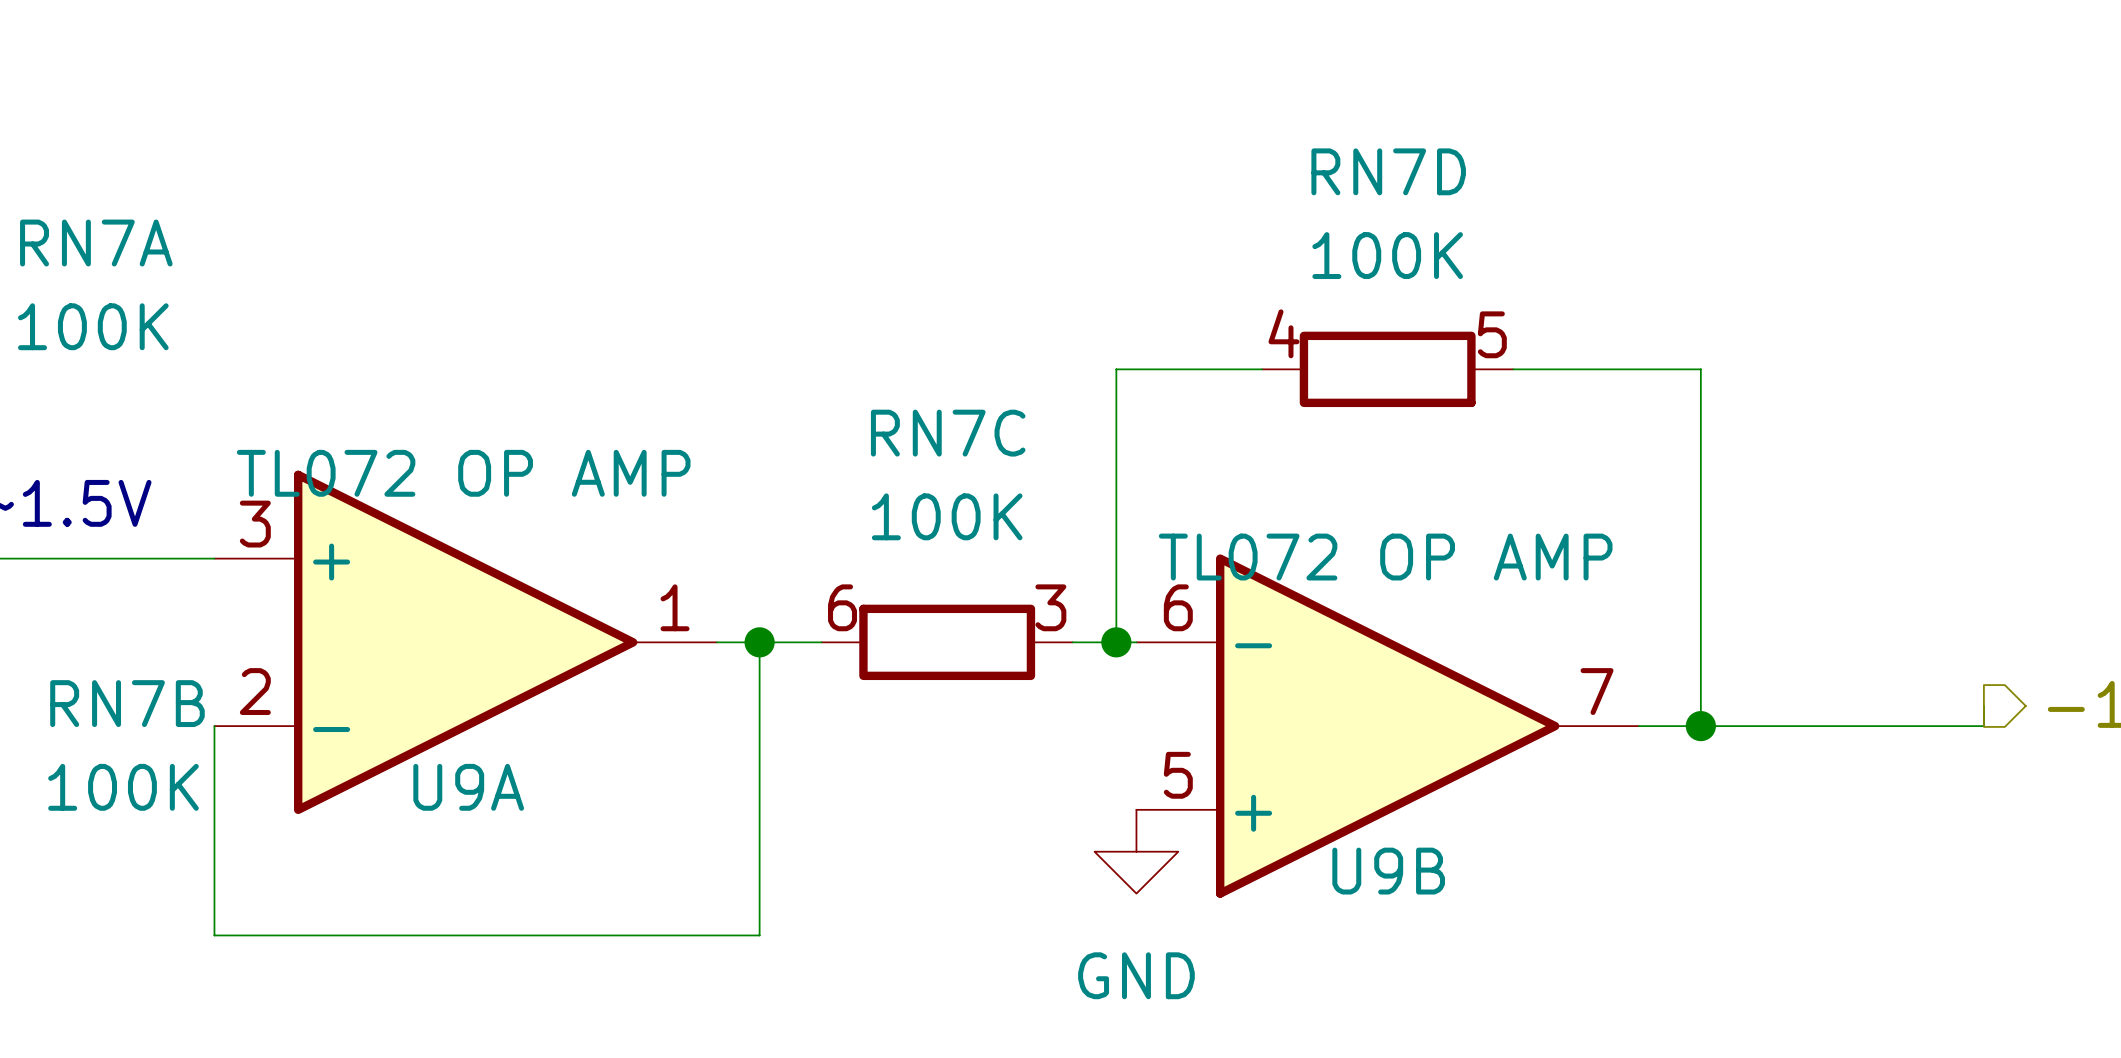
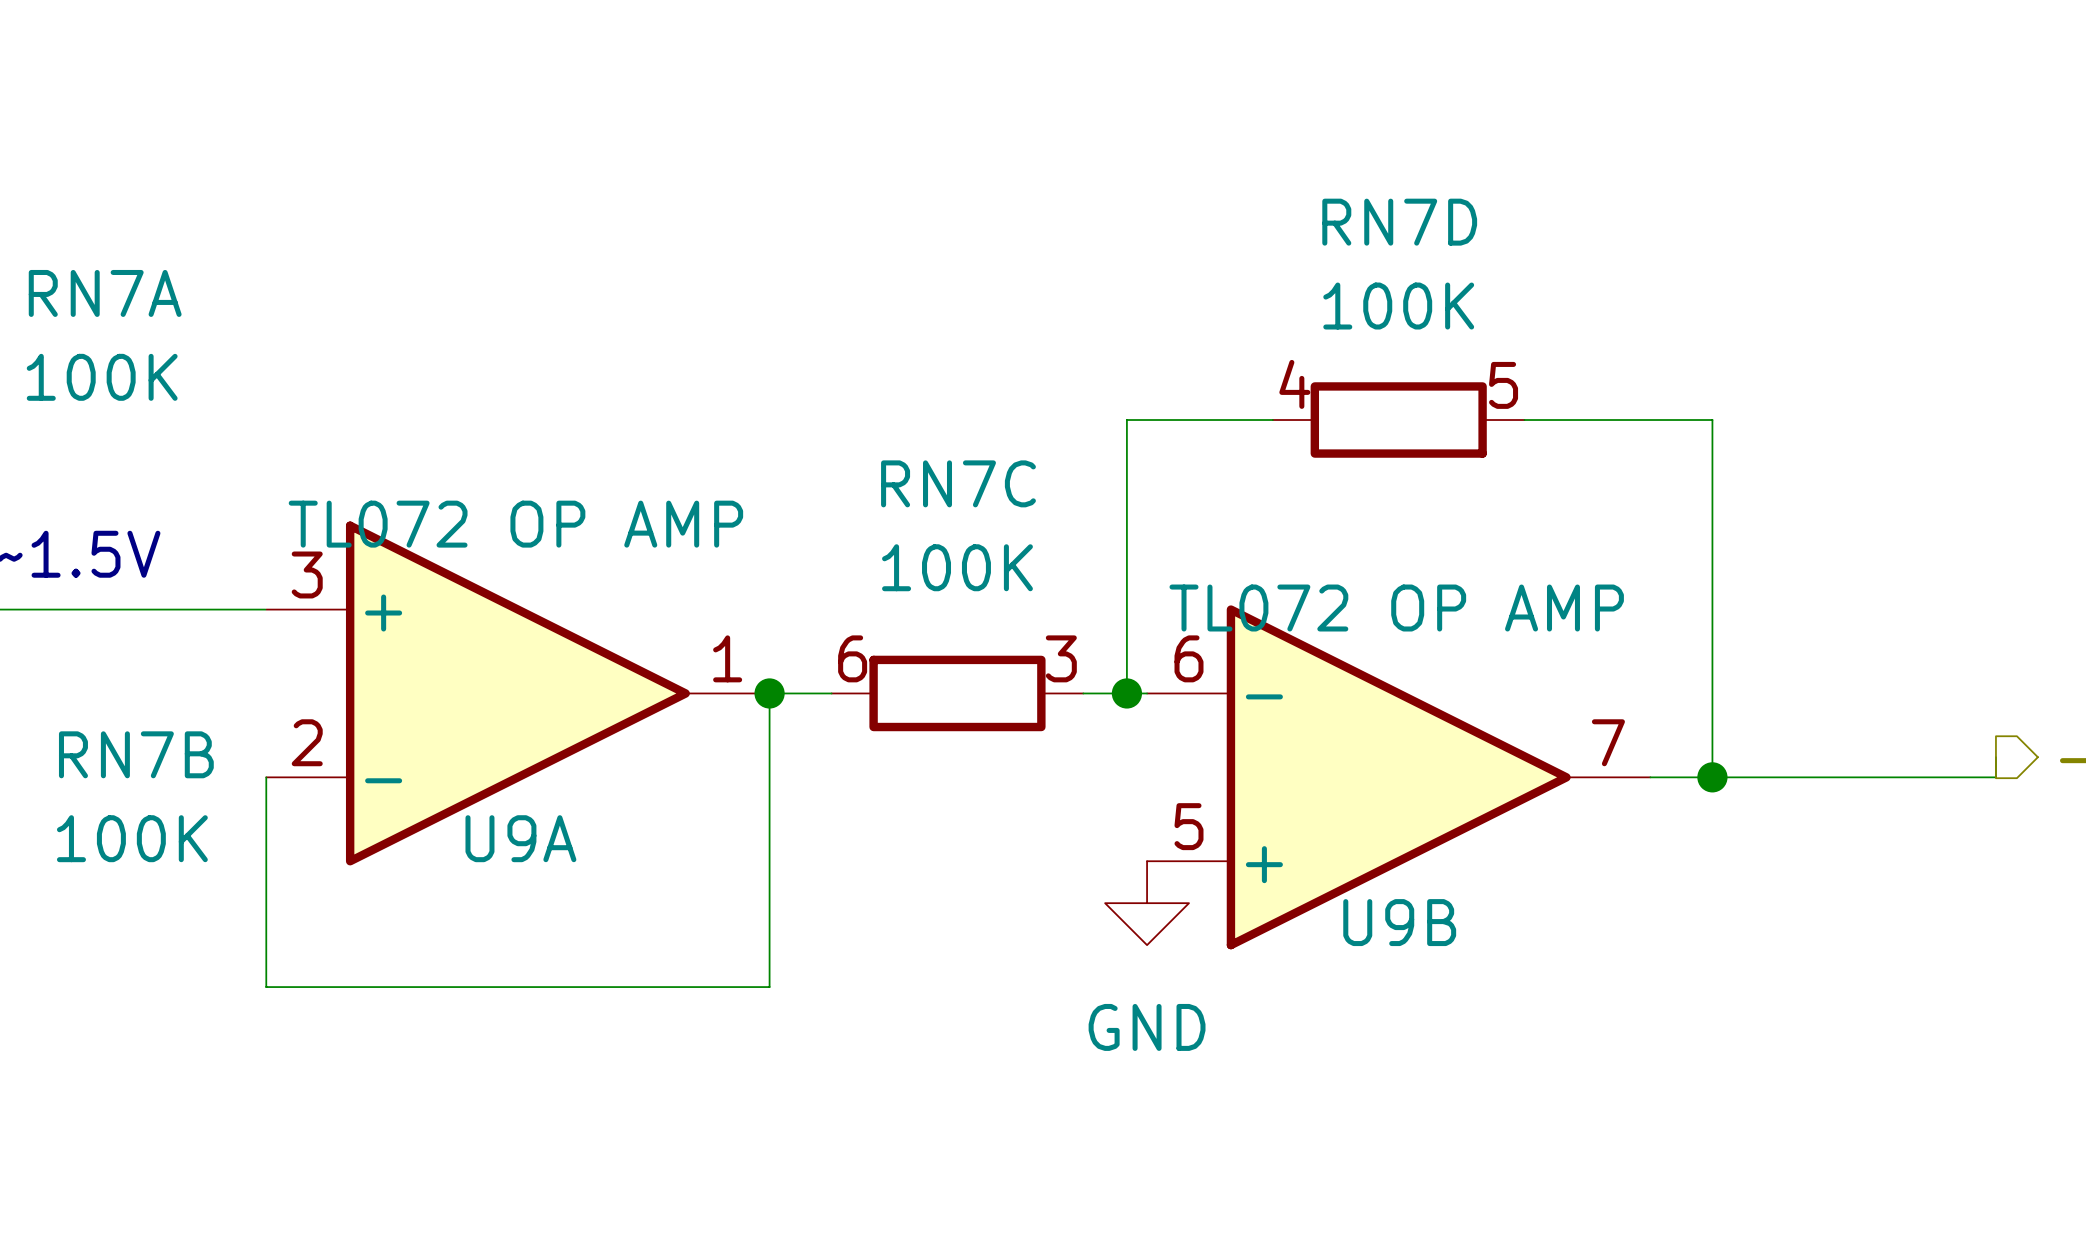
U9A position: (465, 642) -> (517, 693)
wire: (214, 726) (214, 935) (257, 935) -> (266, 777) (266, 987)

